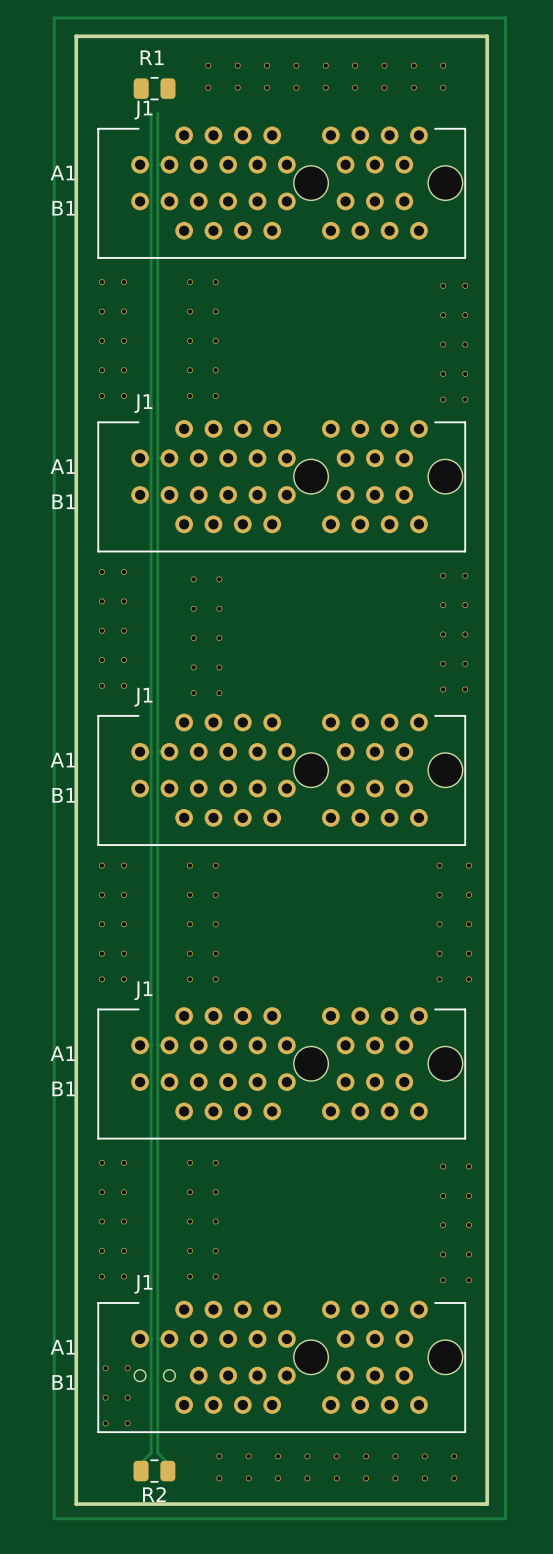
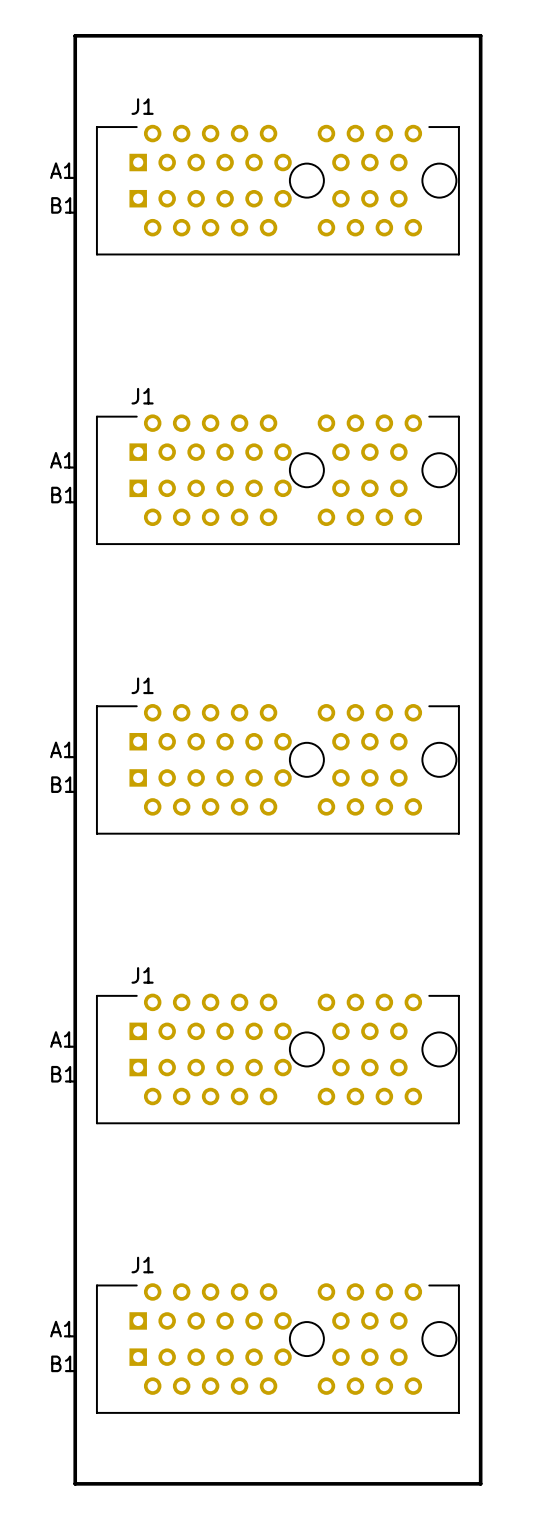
track: (54, 17) (505, 17) (505, 1518) (54, 1518) (54, 17) -> none
via: (208, 65) -> none
via: (237, 65) -> none
via: (267, 65) -> none
via: (296, 65) -> none
via: (325, 65) -> none
via: (355, 65) -> none
via: (384, 65) -> none
via: (413, 65) -> none
via: (443, 65) -> none
via: (208, 87) -> none
via: (237, 87) -> none
via: (267, 87) -> none
via: (296, 87) -> none
via: (325, 87) -> none
via: (355, 87) -> none
via: (384, 87) -> none
via: (413, 87) -> none
via: (443, 87) -> none
R1: (154, 88) -> none
track: (151, 113) (151, 1452) (141, 1462) (141, 1478) -> none
track: (157, 113) (157, 1452) (167, 1462) (167, 1478) -> none
J1 footprint: [97, 126, 467, 259] -> [96, 124, 460, 256]
via: (101, 282) -> none
via: (123, 282) -> none
via: (189, 282) -> none
via: (215, 282) -> none
via: (443, 285) -> none
via: (465, 285) -> none
via: (101, 311) -> none
via: (123, 311) -> none
via: (189, 311) -> none
via: (215, 311) -> none
via: (443, 315) -> none
via: (465, 315) -> none
via: (101, 340) -> none
via: (123, 340) -> none
via: (189, 340) -> none
via: (215, 340) -> none
via: (443, 344) -> none
via: (465, 344) -> none
via: (101, 370) -> none
via: (123, 370) -> none
via: (189, 370) -> none
via: (215, 370) -> none
via: (443, 373) -> none
via: (465, 373) -> none
via: (101, 395) -> none
via: (123, 395) -> none
via: (189, 395) -> none
via: (215, 395) -> none
via: (443, 399) -> none
via: (465, 399) -> none
J1 footprint: [97, 420, 467, 553] -> [96, 414, 460, 546]
via: (101, 572) -> none
via: (123, 572) -> none
via: (443, 575) -> none
via: (465, 575) -> none
via: (193, 579) -> none
via: (219, 579) -> none
via: (101, 601) -> none
via: (123, 601) -> none
via: (443, 605) -> none
via: (465, 605) -> none
via: (193, 608) -> none
via: (219, 608) -> none
via: (101, 630) -> none
via: (123, 630) -> none
via: (443, 634) -> none
via: (465, 634) -> none
via: (193, 638) -> none
via: (219, 638) -> none
via: (101, 660) -> none
via: (123, 660) -> none
via: (443, 663) -> none
via: (465, 663) -> none
via: (193, 667) -> none
via: (219, 667) -> none
via: (101, 685) -> none
via: (123, 685) -> none
via: (443, 689) -> none
via: (465, 689) -> none
via: (193, 693) -> none
via: (219, 693) -> none
J1 footprint: [97, 713, 467, 846] -> [96, 704, 460, 835]
via: (101, 865) -> none
via: (123, 865) -> none
via: (189, 865) -> none
via: (215, 865) -> none
via: (439, 865) -> none
via: (468, 865) -> none
via: (101, 894) -> none
via: (123, 894) -> none
via: (189, 894) -> none
via: (215, 894) -> none
via: (439, 894) -> none
via: (468, 894) -> none
via: (101, 924) -> none
via: (123, 924) -> none
via: (189, 924) -> none
via: (215, 924) -> none
via: (439, 924) -> none
via: (468, 924) -> none
via: (101, 953) -> none
via: (123, 953) -> none
via: (189, 953) -> none
via: (215, 953) -> none
via: (439, 953) -> none
via: (468, 953) -> none
via: (101, 979) -> none
via: (123, 979) -> none
via: (189, 979) -> none
via: (215, 979) -> none
via: (439, 979) -> none
via: (468, 979) -> none
J1 footprint: [97, 1007, 467, 1140] -> [96, 993, 460, 1125]
via: (101, 1162) -> none
via: (123, 1162) -> none
via: (189, 1162) -> none
via: (215, 1162) -> none
via: (443, 1166) -> none
via: (468, 1166) -> none
via: (101, 1192) -> none
via: (123, 1192) -> none
via: (189, 1192) -> none
via: (215, 1192) -> none
via: (443, 1195) -> none
via: (468, 1195) -> none
via: (101, 1221) -> none
via: (123, 1221) -> none
via: (189, 1221) -> none
via: (215, 1221) -> none
via: (443, 1225) -> none
via: (468, 1225) -> none
via: (101, 1250) -> none
via: (123, 1250) -> none
via: (189, 1250) -> none
via: (215, 1250) -> none
via: (443, 1254) -> none
via: (468, 1254) -> none
via: (101, 1276) -> none
via: (123, 1276) -> none
via: (189, 1276) -> none
via: (215, 1276) -> none
via: (443, 1280) -> none
via: (468, 1280) -> none
J1 footprint: [97, 1300, 467, 1434] -> [96, 1283, 460, 1414]
via: (105, 1368) -> none
via: (127, 1368) -> none
via: (105, 1397) -> none
via: (127, 1397) -> none
via: (105, 1423) -> none
via: (127, 1423) -> none
via: (219, 1456) -> none
via: (248, 1456) -> none
via: (278, 1456) -> none
via: (307, 1456) -> none
via: (336, 1456) -> none
via: (366, 1456) -> none
via: (395, 1456) -> none
via: (424, 1456) -> none
via: (454, 1456) -> none
R2: (154, 1471) -> none
via: (219, 1478) -> none
via: (248, 1478) -> none
via: (278, 1478) -> none
via: (307, 1478) -> none
via: (336, 1478) -> none
via: (366, 1478) -> none
via: (395, 1478) -> none
via: (424, 1478) -> none
via: (454, 1478) -> none

